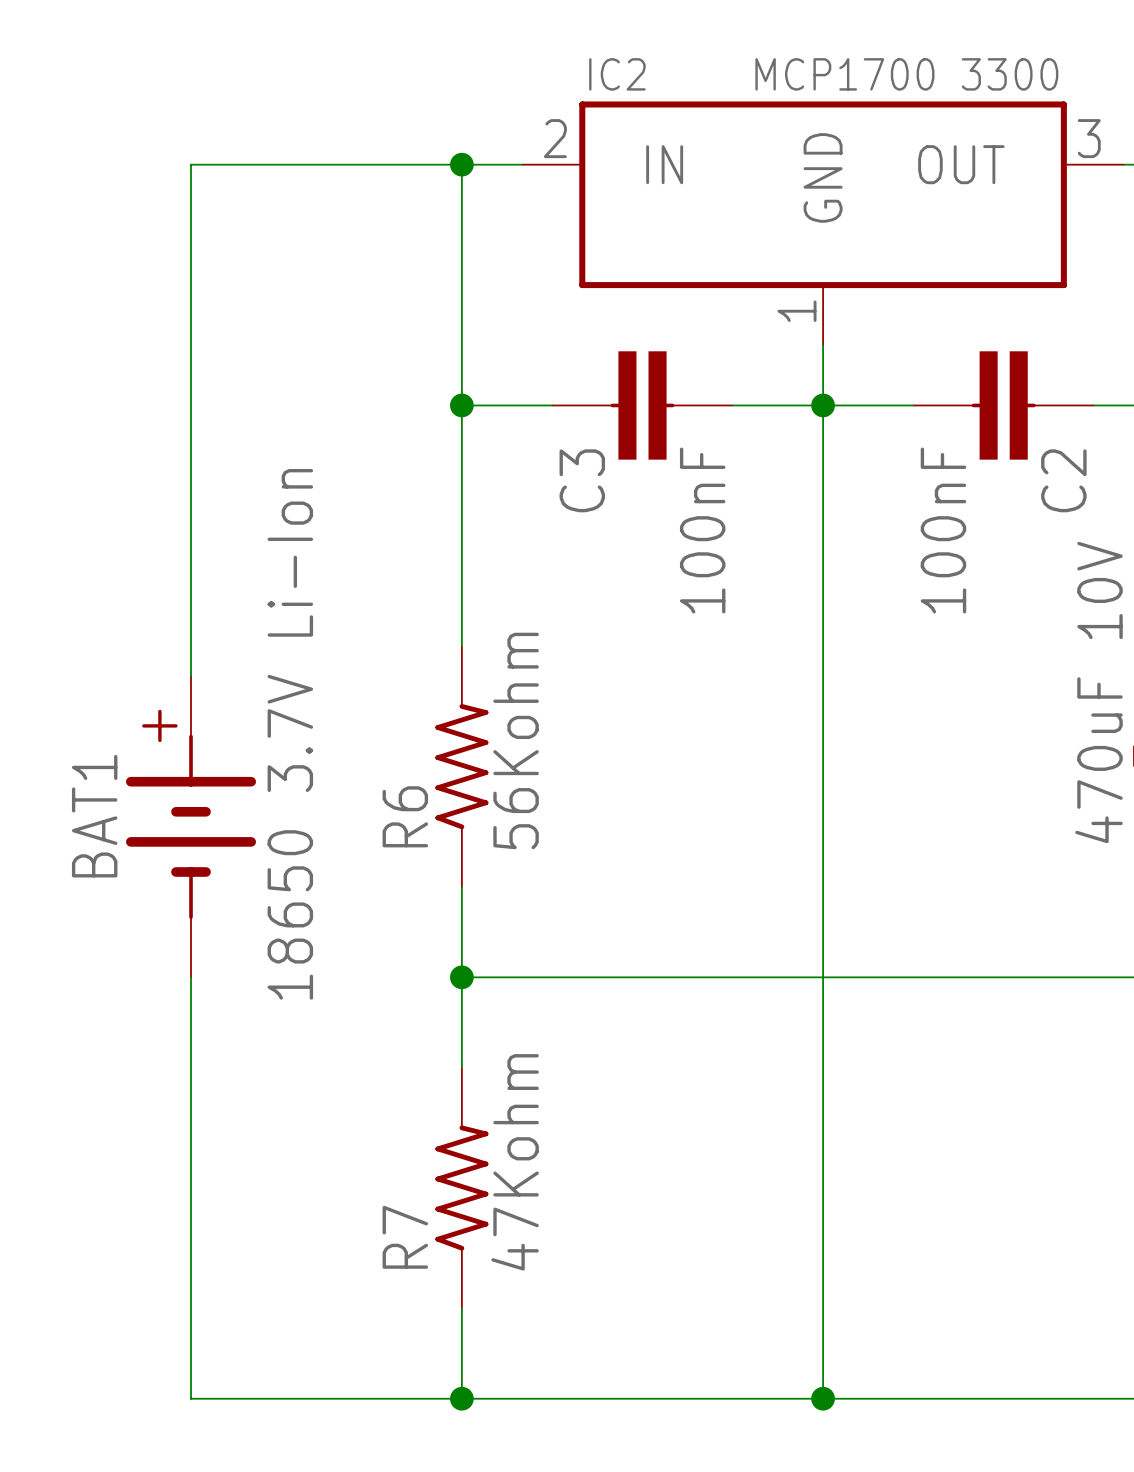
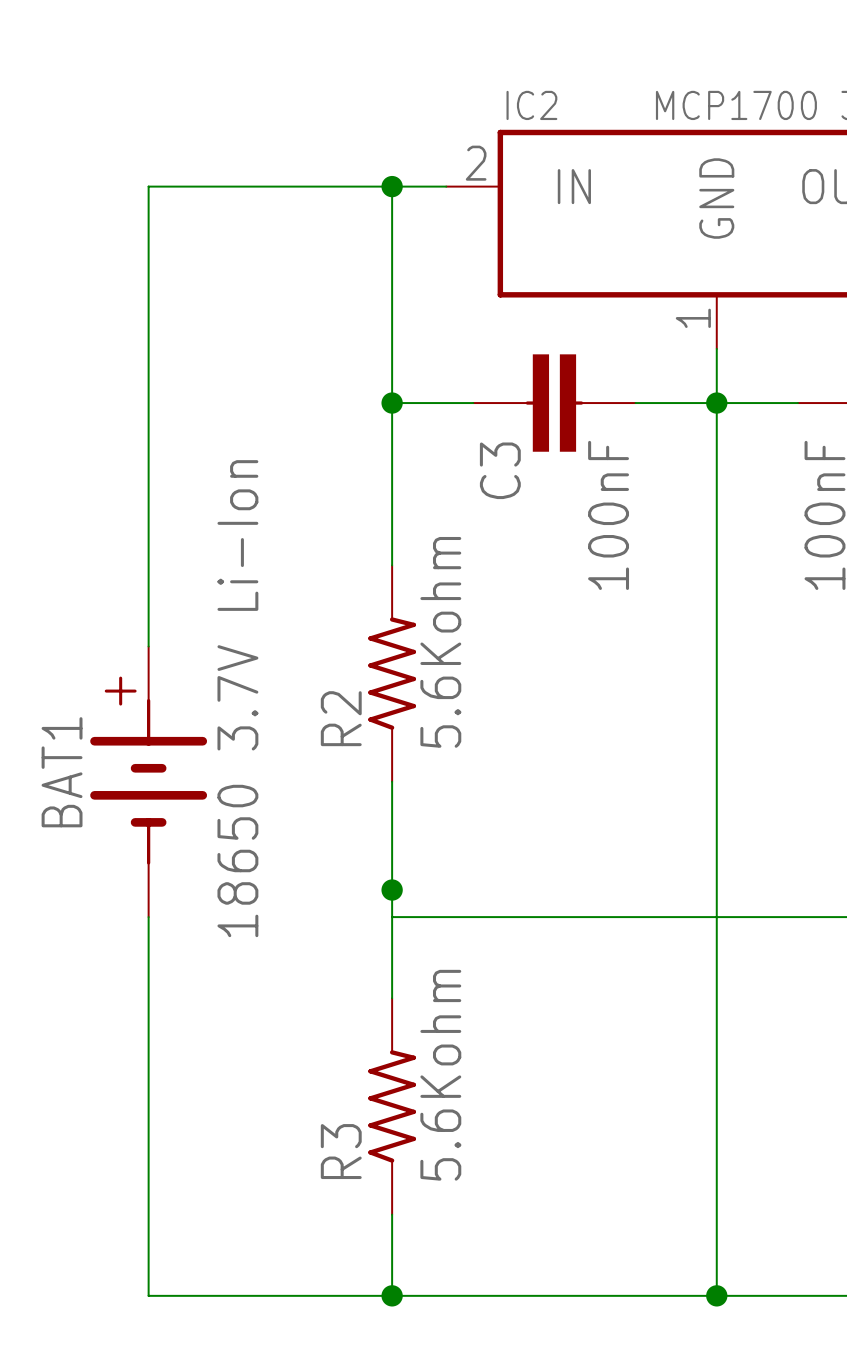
R2: none -> 5.6Kohm (392, 673)
R6: 56Kohm (461, 766) -> none
junction position: (461, 977) -> (392, 890)
R7 value: 47Kohm (515, 1162) -> 5.6Kohm (440, 1075)
R7 name: R7 (405, 1237) -> R3 (341, 1151)

